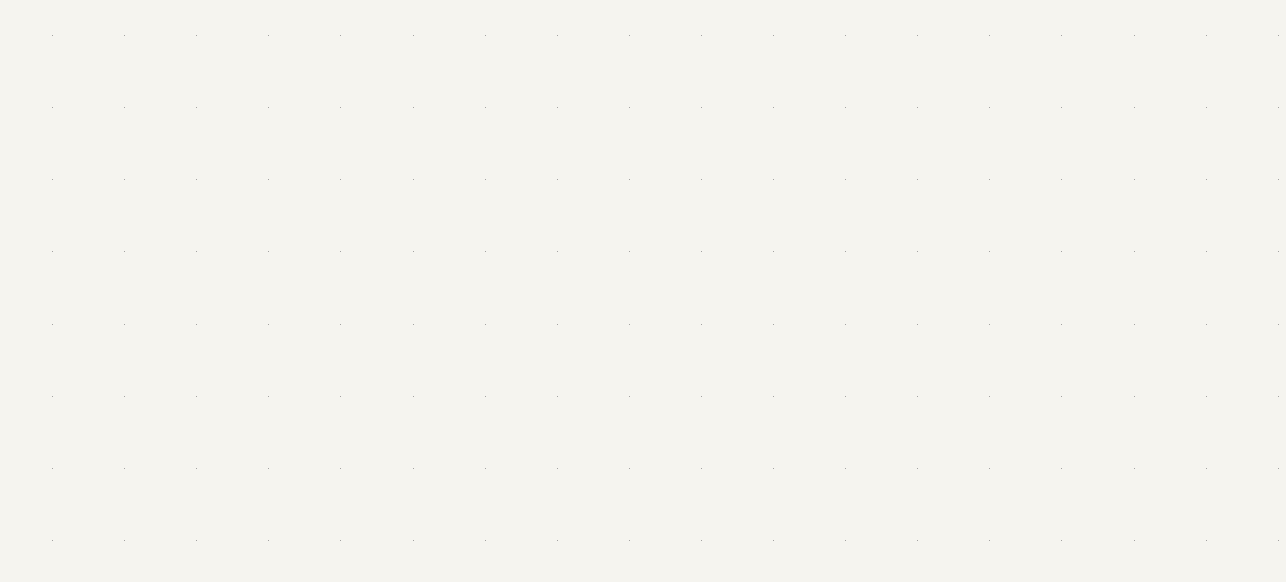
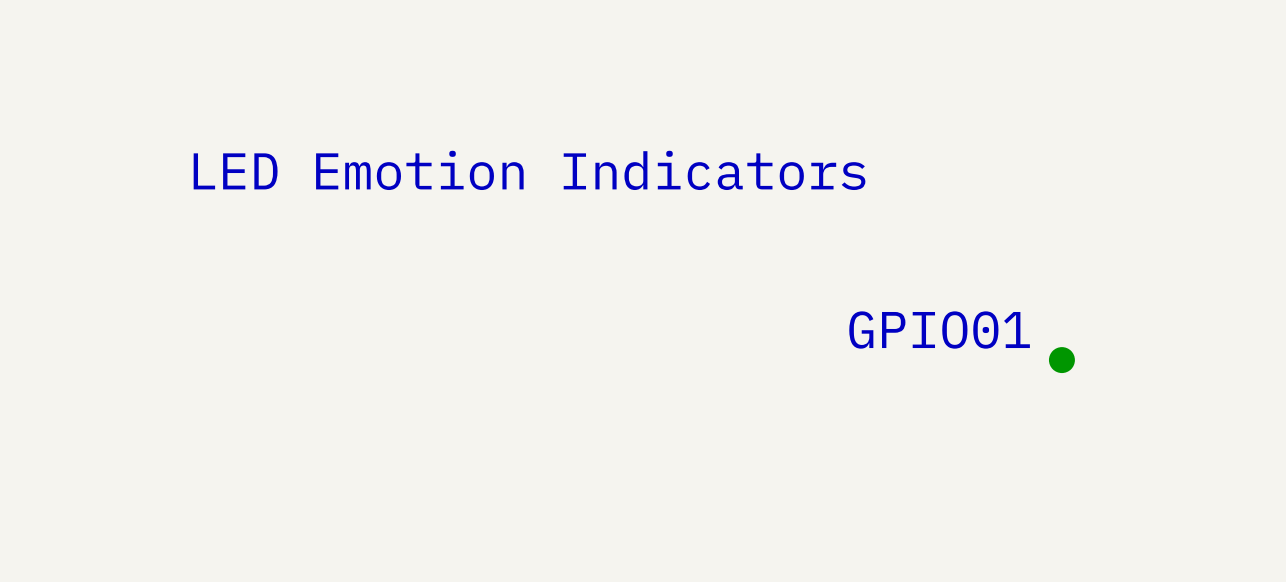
text: none -> LED Emotion Indicators (529, 170)
text: none -> GPIO01 (939, 330)
junction: none -> (1061, 360)

